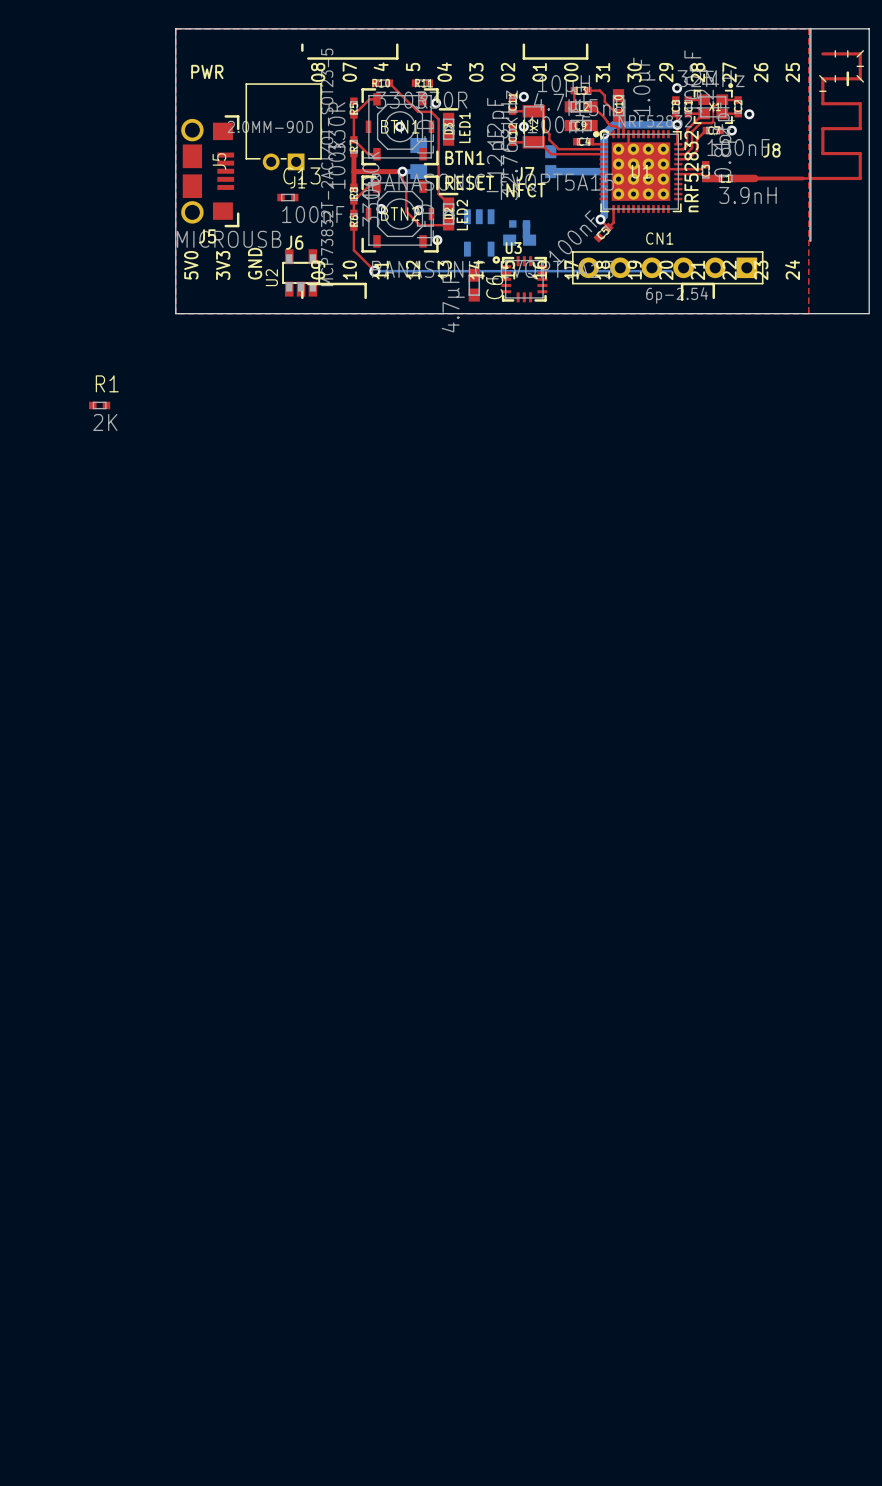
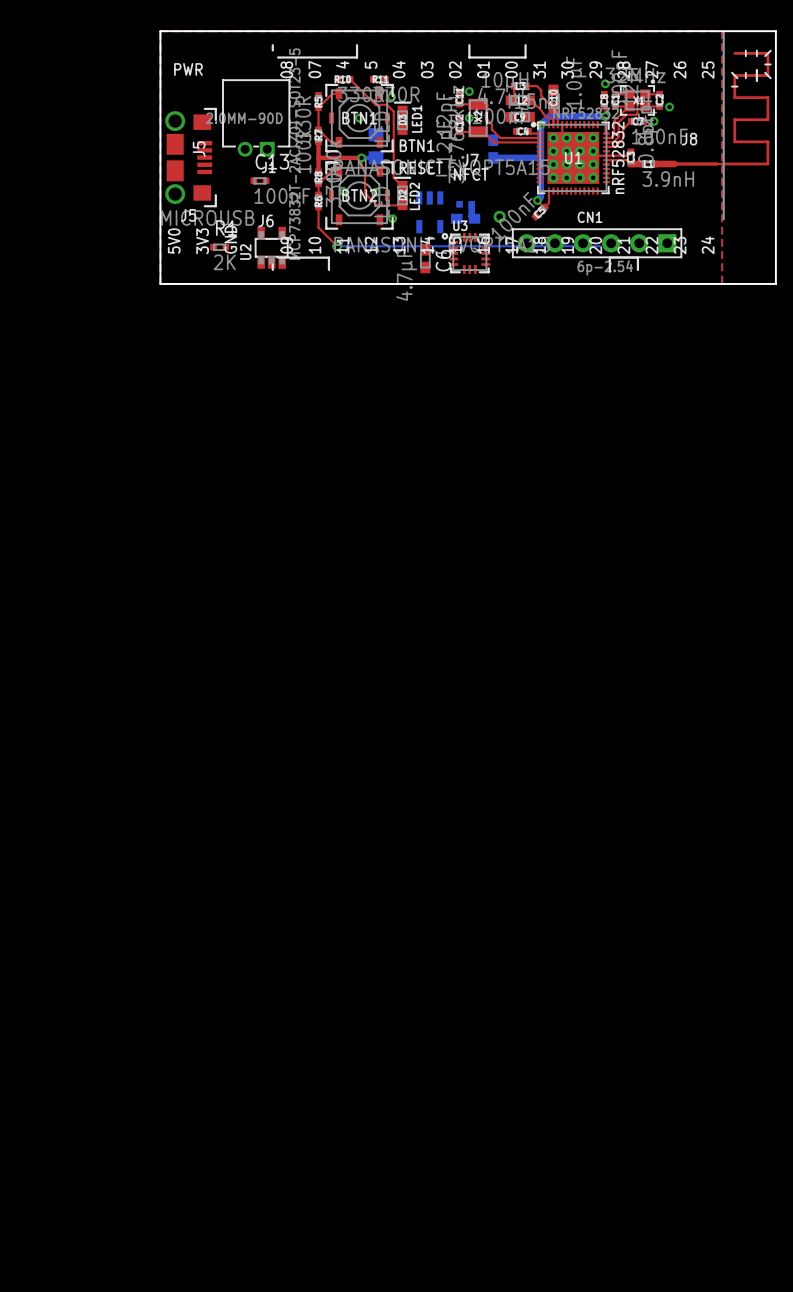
part: none -> (499, 216)
R1 position: (99, 405) -> (219, 247)

